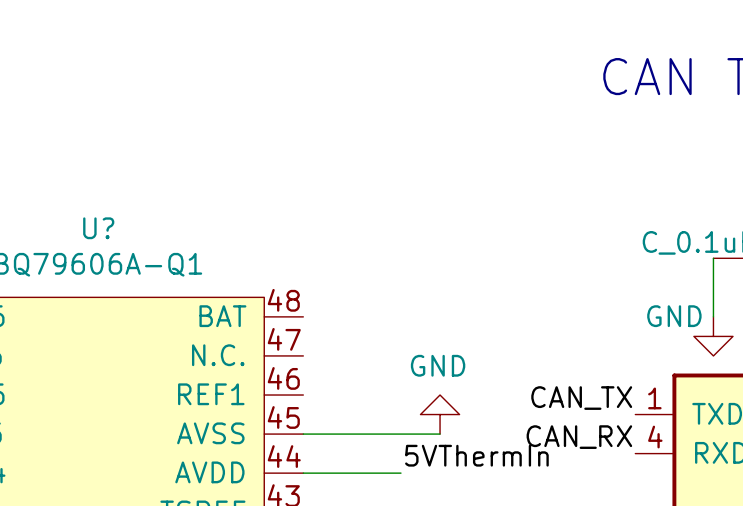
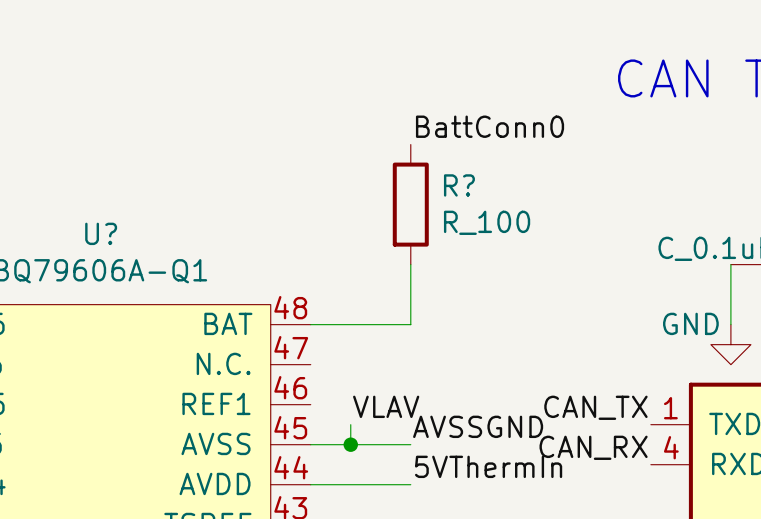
label: none -> BattConn0 (490, 126)
R?: none -> R_100 (410, 204)
wire: none -> (410, 264) (410, 324) (310, 324)
label: none -> VLAV (386, 406)
wire: none -> (350, 424) (350, 444)
power symbol: GND (440, 414) -> none
label: none -> AVSSGND (478, 426)
junction: none -> (350, 444)
wire: (400, 434) (440, 434) -> none

